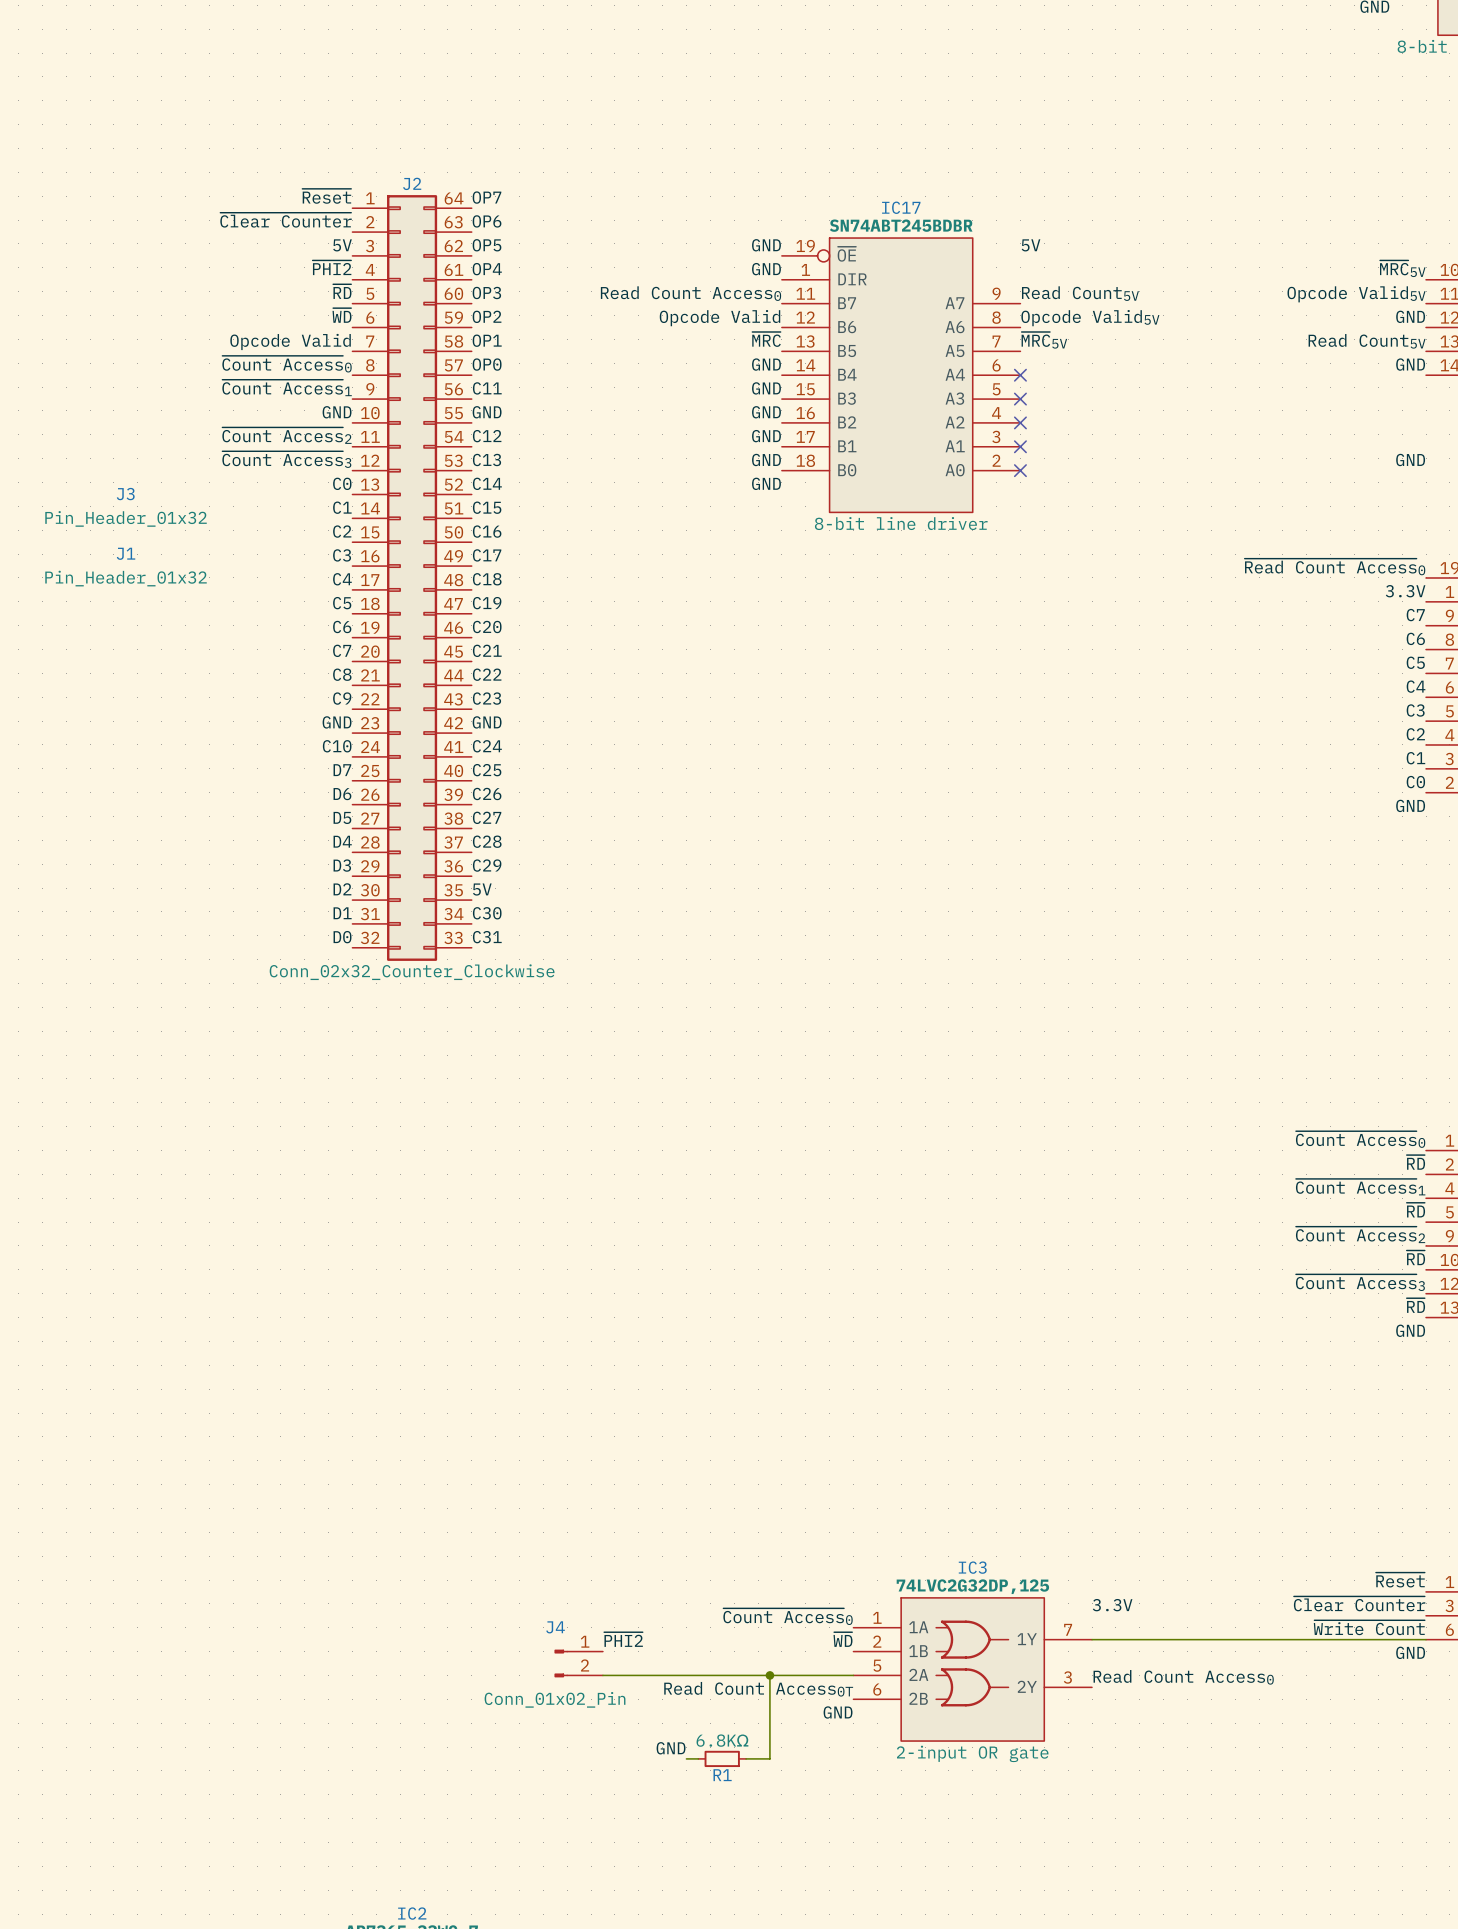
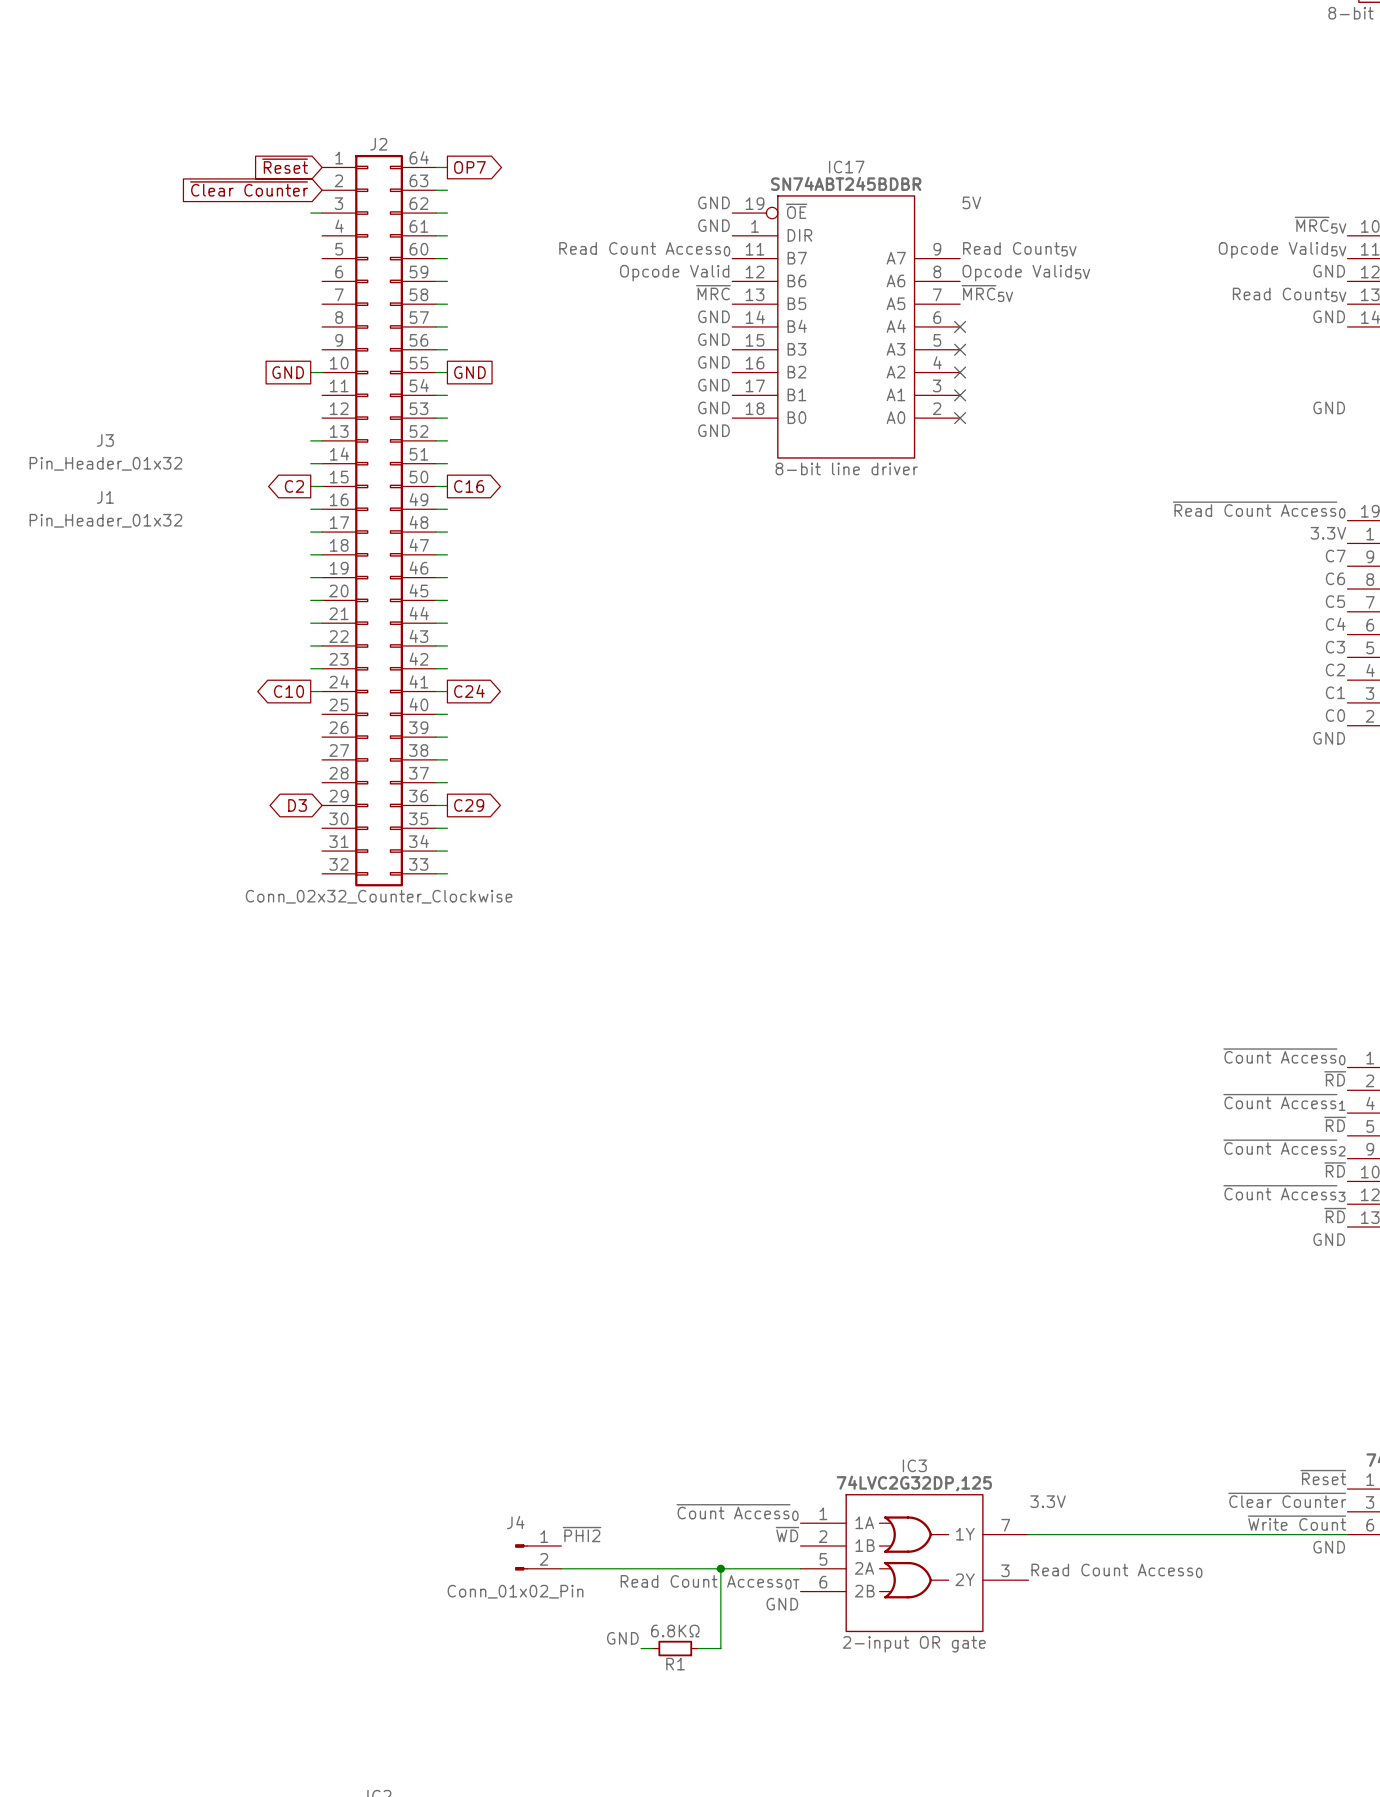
label: ~{Reset} (326, 196) -> none
label: OP7 (486, 197) -> none
global label: none -> ~{Reset} (285, 166)
wire: none -> (436, 167) (447, 167)
global label: none -> OP7 (469, 167)
label: ~{Clear Counter} (286, 220) -> none
label: OP6 (487, 221) -> none
global label: none -> ~{Clear Counter} (249, 188)
wire: none -> (436, 190) (447, 190)
label: 5V (342, 245) -> none
label: OP5 (487, 245) -> none
wire: none -> (310, 213) (322, 213)
wire: none -> (436, 213) (447, 213)
label: ~{PHI2} (331, 267) -> none
label: OP4 (487, 269) -> none
wire: none -> (436, 235) (447, 235)
label: ~{RD} (342, 291) -> none
label: OP3 (486, 292) -> none
wire: none -> (436, 258) (447, 258)
label: ~{WD} (342, 315) -> none
label: OP2 (487, 316) -> none
wire: none -> (436, 281) (447, 281)
label: OP1 (487, 340) -> none
label: Opcode Valid (290, 341) -> none
wire: none -> (436, 304) (447, 304)
label: ~{Count Access}0 (287, 364) -> none
label: OP0 (487, 364) -> none
wire: none -> (436, 326) (447, 326)
label: ~{Count Access}1 (287, 387) -> none
label: C11 (487, 388) -> none
wire: none -> (436, 349) (447, 349)
label: GND (337, 412) -> none
label: GND (487, 412) -> none
global label: none -> GND (288, 372)
wire: none -> (310, 372) (322, 372)
wire: none -> (436, 372) (447, 372)
global label: none -> GND (469, 372)
label: ~{Count Access}2 (286, 435) -> none
label: C12 (487, 436) -> none
wire: none -> (436, 395) (447, 395)
label: ~{Count Access}3 (286, 459) -> none
label: C13 (487, 459) -> none
wire: none -> (436, 418) (447, 418)
label: C0 (342, 483) -> none
label: C14 (487, 483) -> none
wire: none -> (310, 440) (322, 440)
wire: none -> (436, 440) (447, 440)
label: C1 (342, 507) -> none
label: C15 (487, 507) -> none
wire: none -> (310, 463) (322, 463)
wire: none -> (436, 463) (447, 463)
label: C2 (342, 531) -> none
label: C16 (487, 531) -> none
global label: none -> C2 (294, 486)
wire: none -> (310, 486) (322, 486)
wire: none -> (436, 486) (447, 486)
global label: none -> C16 (469, 486)
label: C3 (342, 555) -> none
label: C17 (487, 555) -> none
wire: none -> (310, 509) (322, 509)
wire: none -> (436, 509) (447, 509)
label: C4 (342, 579) -> none
label: C18 (487, 579) -> none
wire: none -> (310, 532) (322, 532)
wire: none -> (436, 532) (447, 532)
label: C5 (342, 603) -> none
label: C19 (487, 603) -> none
wire: none -> (310, 554) (322, 554)
wire: none -> (436, 554) (447, 554)
label: C6 (342, 626) -> none
label: C20 (487, 626) -> none
wire: none -> (310, 577) (322, 577)
wire: none -> (436, 577) (447, 577)
label: C7 (342, 650) -> none
label: C21 (487, 650) -> none
wire: none -> (310, 600) (322, 600)
wire: none -> (436, 600) (447, 600)
label: C8 (342, 674) -> none
label: C22 (487, 674) -> none
wire: none -> (310, 623) (322, 623)
wire: none -> (436, 623) (447, 623)
label: C9 (342, 698) -> none
label: C23 (487, 698) -> none
wire: none -> (310, 645) (322, 645)
wire: none -> (436, 645) (447, 645)
label: GND (337, 722) -> none
label: GND (487, 722) -> none
wire: none -> (310, 668) (322, 668)
wire: none -> (436, 668) (447, 668)
label: C10 (337, 746) -> none
label: C24 (487, 746) -> none
global label: none -> C10 (289, 691)
wire: none -> (310, 691) (322, 691)
wire: none -> (436, 691) (447, 691)
global label: none -> C24 (469, 691)
label: D7 (342, 770) -> none
label: C25 (487, 770) -> none
wire: none -> (436, 714) (447, 714)
label: C26 (487, 793) -> none
label: D6 (342, 794) -> none
wire: none -> (436, 737) (447, 737)
label: D5 (342, 817) -> none
label: C27 (487, 817) -> none
wire: none -> (436, 759) (447, 759)
label: D4 (342, 841) -> none
label: C28 (487, 841) -> none
wire: none -> (436, 782) (447, 782)
label: D3 (342, 865) -> none
label: C29 (487, 865) -> none
global label: none -> D3 (297, 805)
wire: none -> (436, 805) (447, 805)
global label: none -> C29 (469, 805)
label: D2 (342, 889) -> none
label: 5V (482, 889) -> none
wire: none -> (436, 828) (447, 828)
label: D1 (342, 913) -> none
label: C30 (487, 913) -> none
wire: none -> (436, 851) (447, 851)
label: D0 (342, 937) -> none
label: C31 (487, 937) -> none
wire: none -> (436, 873) (447, 873)

